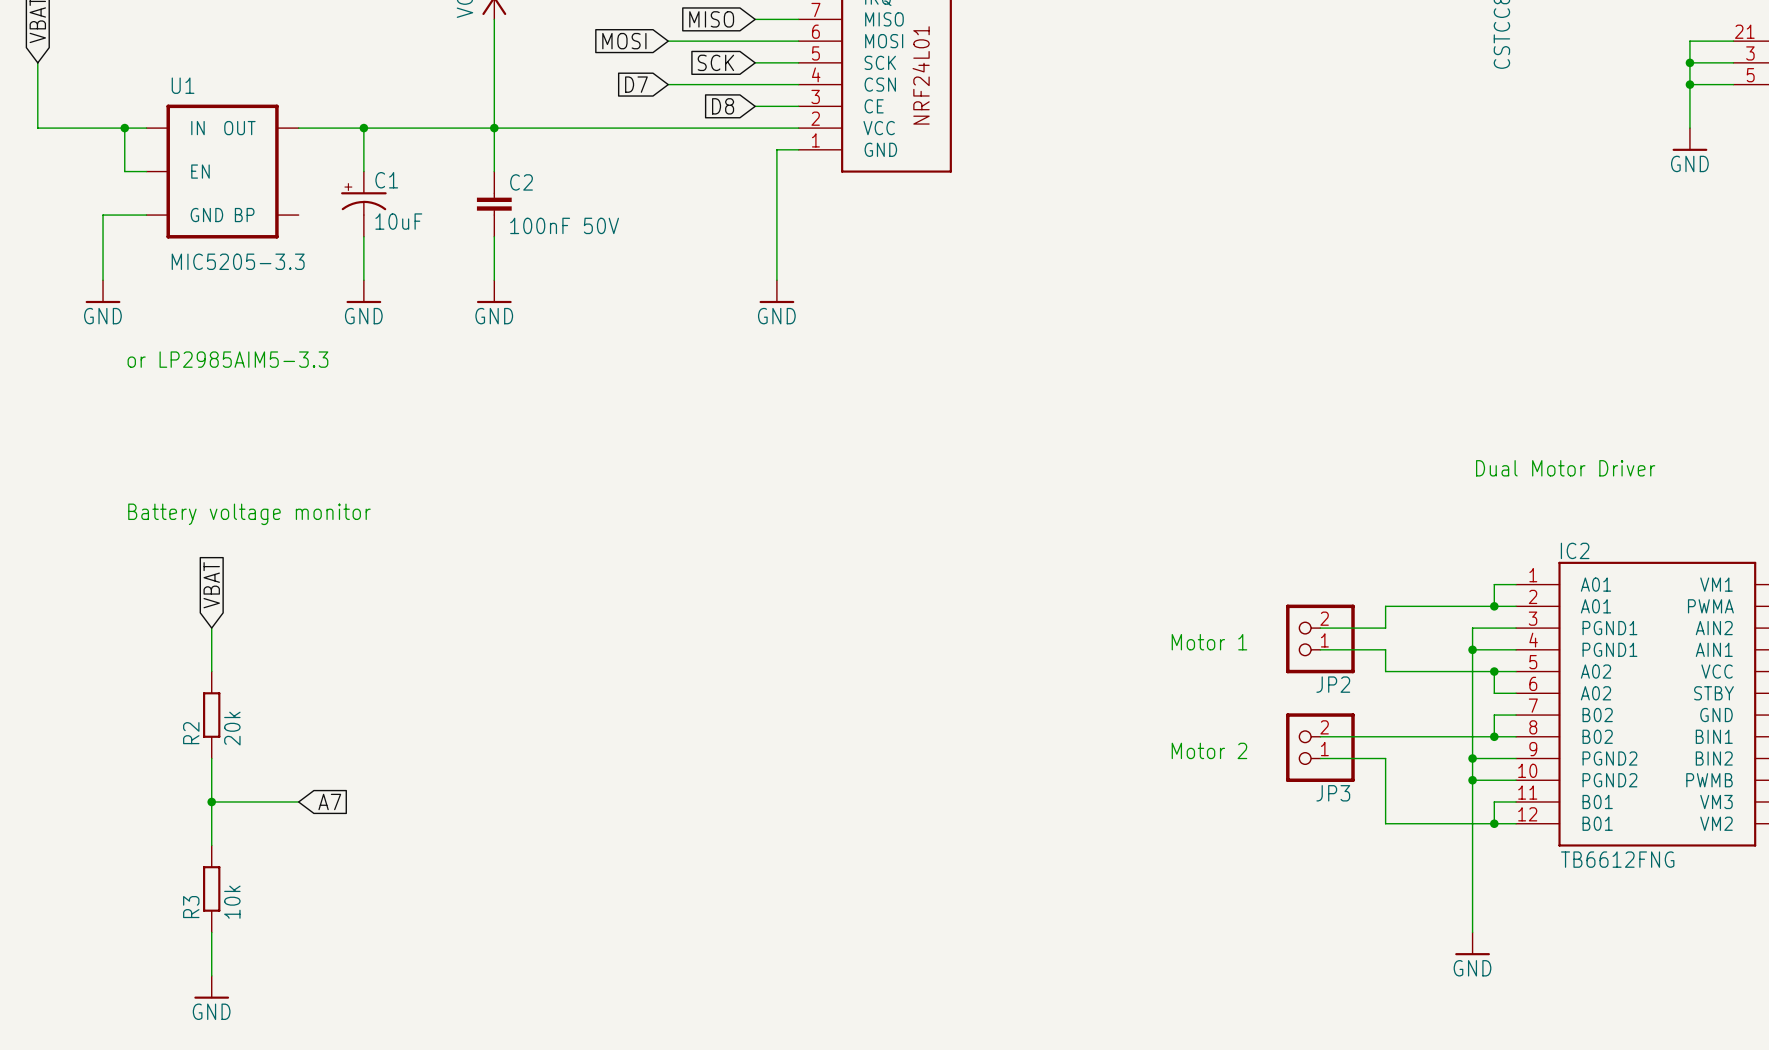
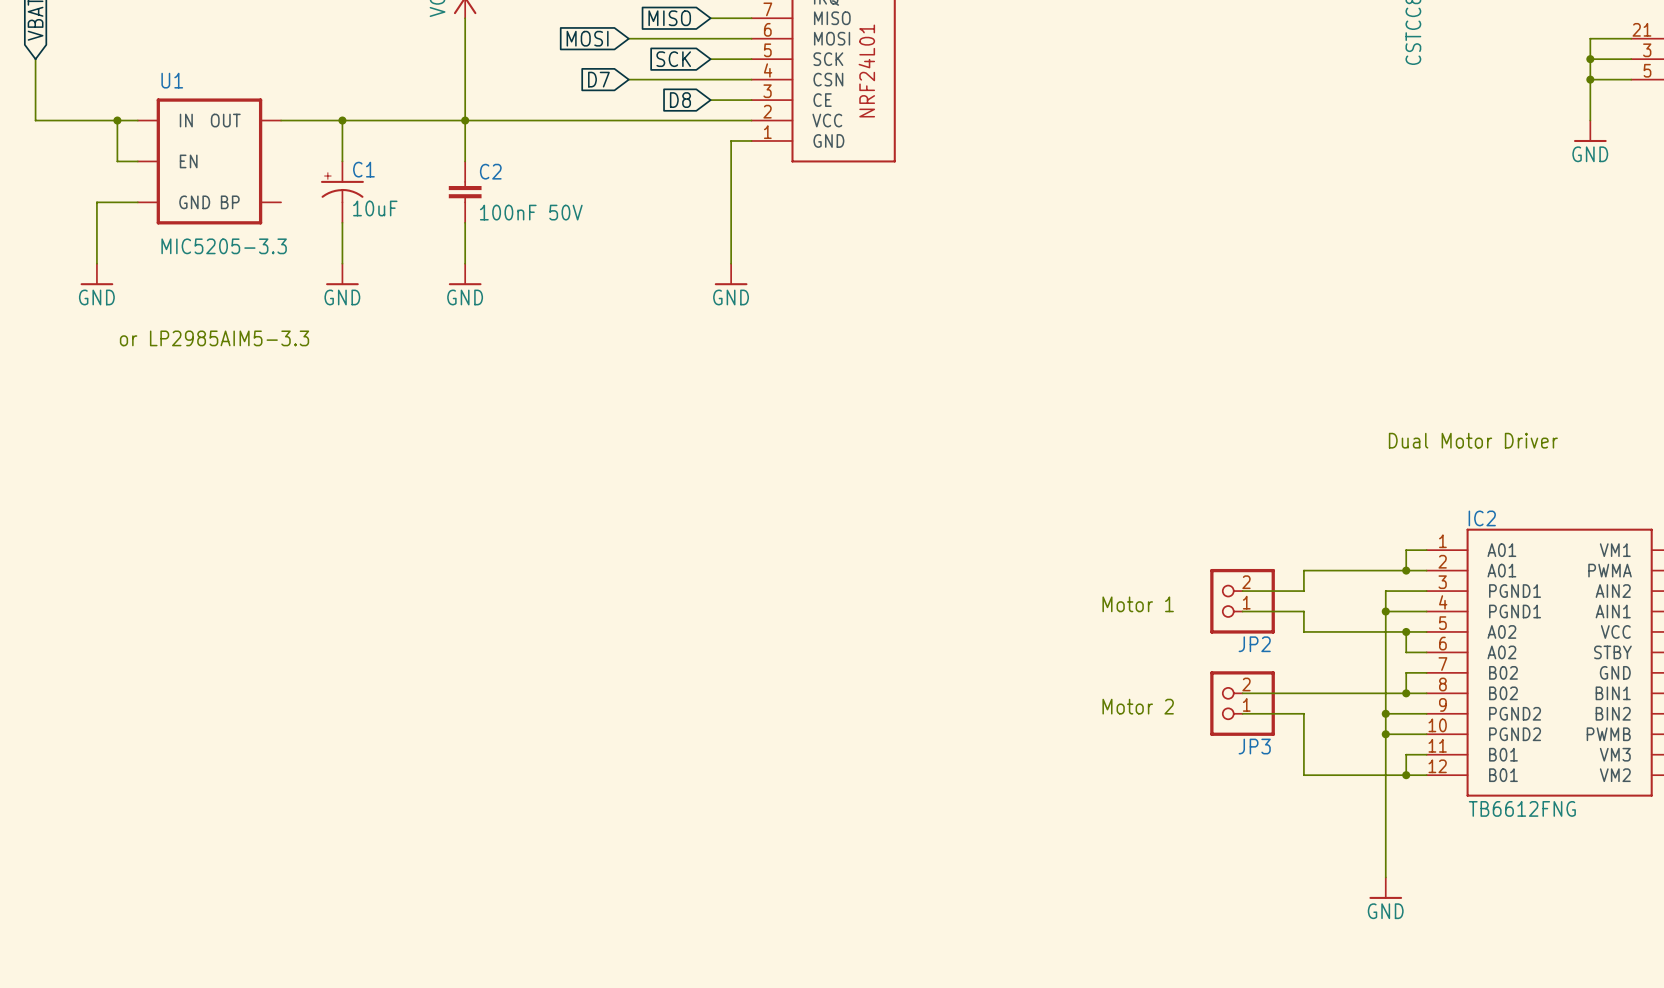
text: Battery voltage monitor (249, 514) -> none
global label: VBAT (211, 585) -> none
wire: (211, 628) (211, 671) -> none
R2: 20k (211, 715) -> none
wire: (211, 758) (211, 845) -> none
wire: (211, 801) (298, 801) -> none
junction: (211, 801) -> none
global label: A7 (329, 801) -> none
R3: 10k (211, 888) -> none
wire: (211, 932) (211, 975) -> none
power symbol: GND (211, 987) -> none

